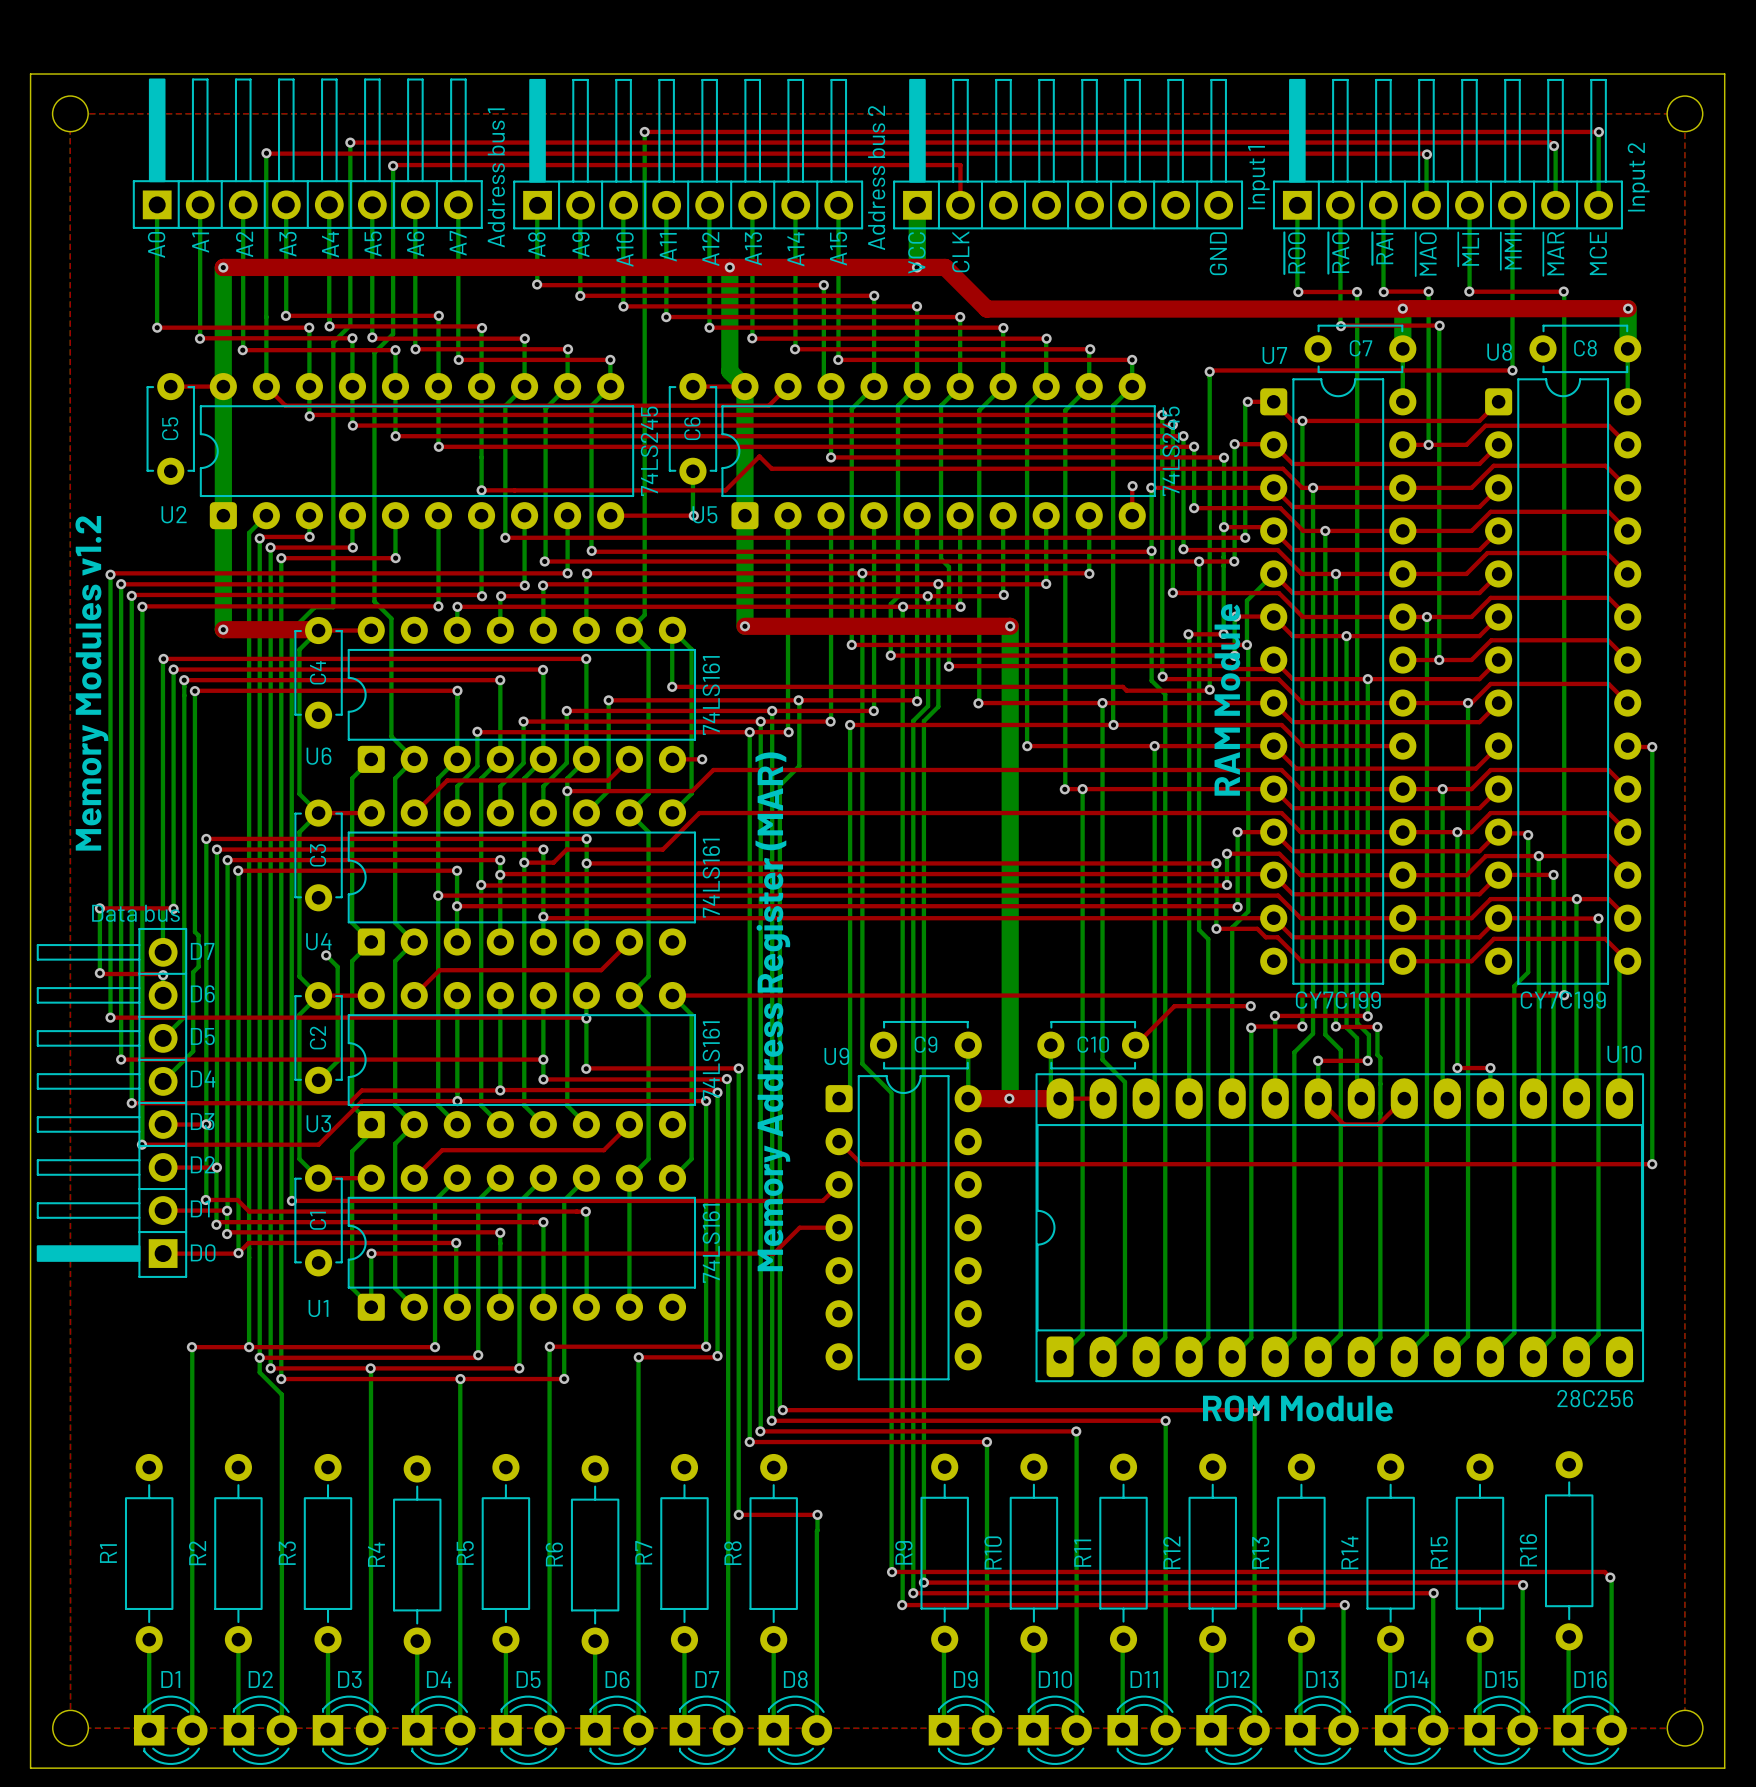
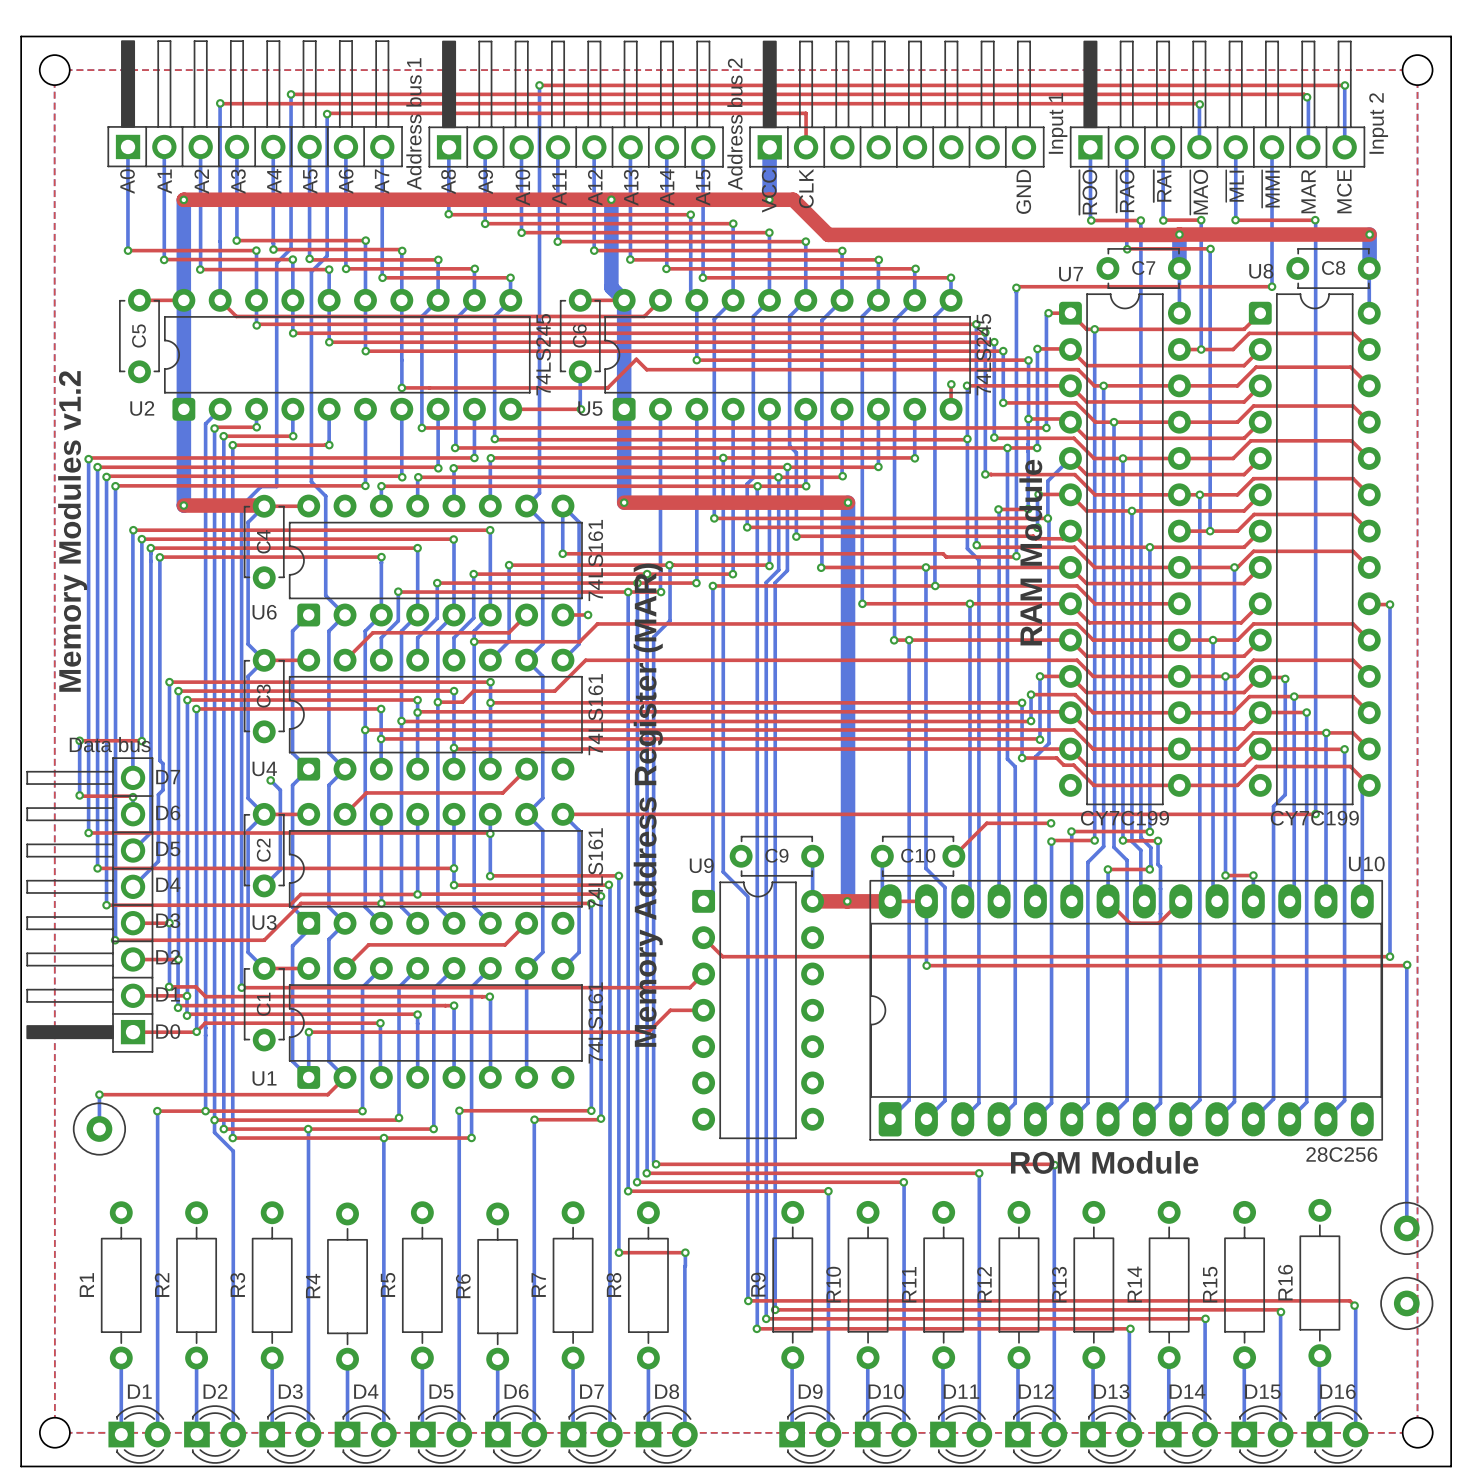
part text: ~{MAR} (1553, 253) -> MAR (1308, 191)
bottom track: none -> (926, 901) (926, 965)
top track: none -> (1407, 964) (926, 965)
bottom track: none -> (1407, 964) (1406, 1228)
via: none -> (1407, 964)
via: none -> (926, 965)
top track: none -> (345, 1077) (327, 1094) (99, 1094)
bottom track: none -> (99, 1094) (99, 1129)
via: none -> (99, 1094)
part: none -> (99, 1129)
part: none -> (1406, 1228)
part: none -> (1406, 1303)

